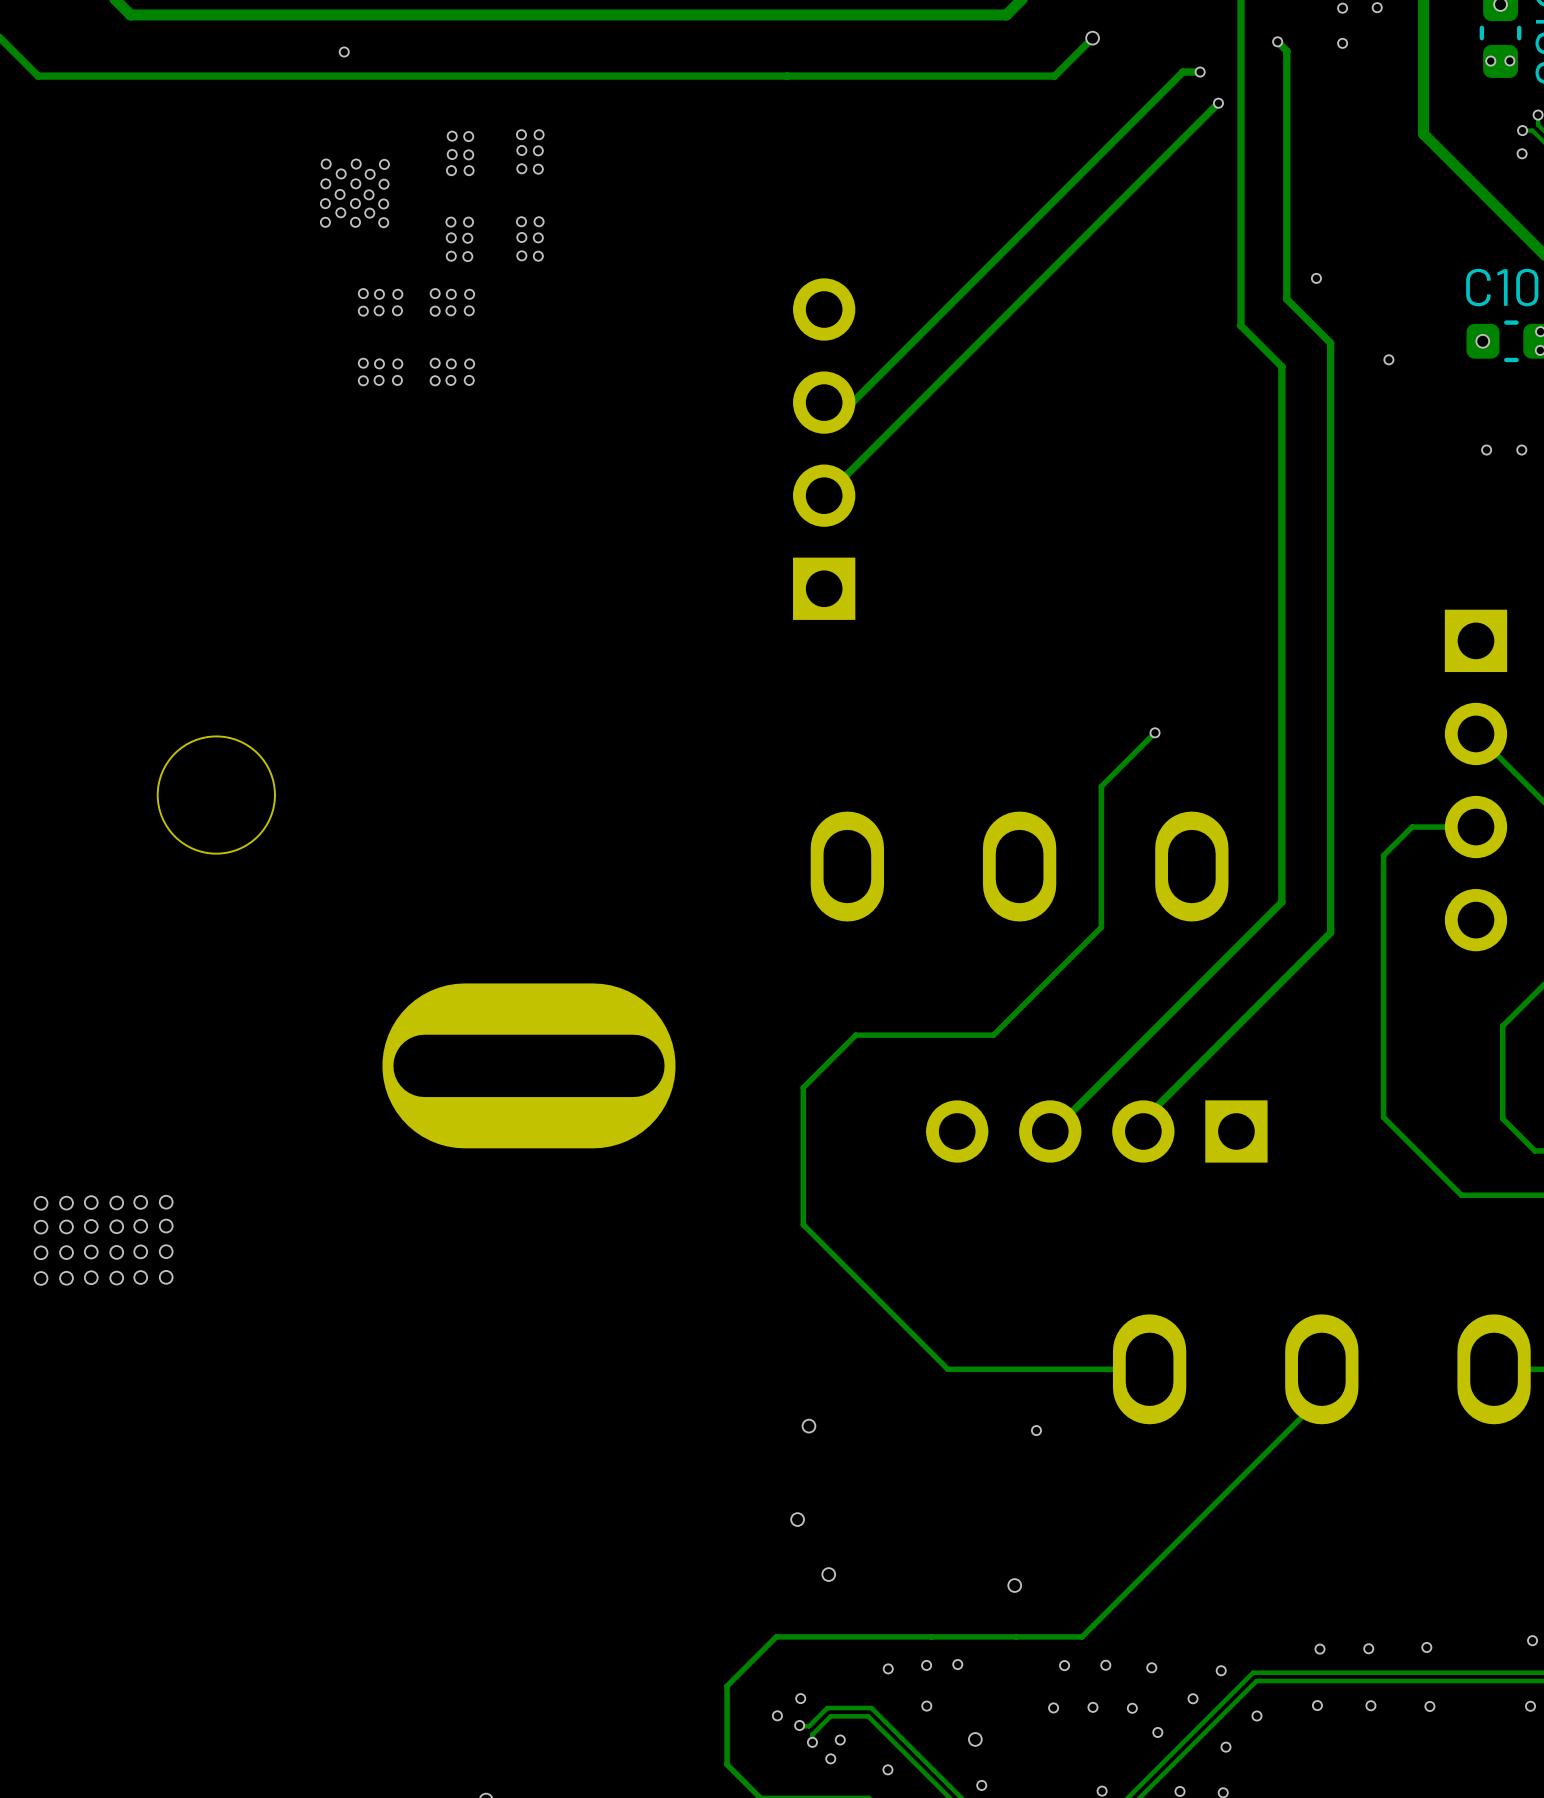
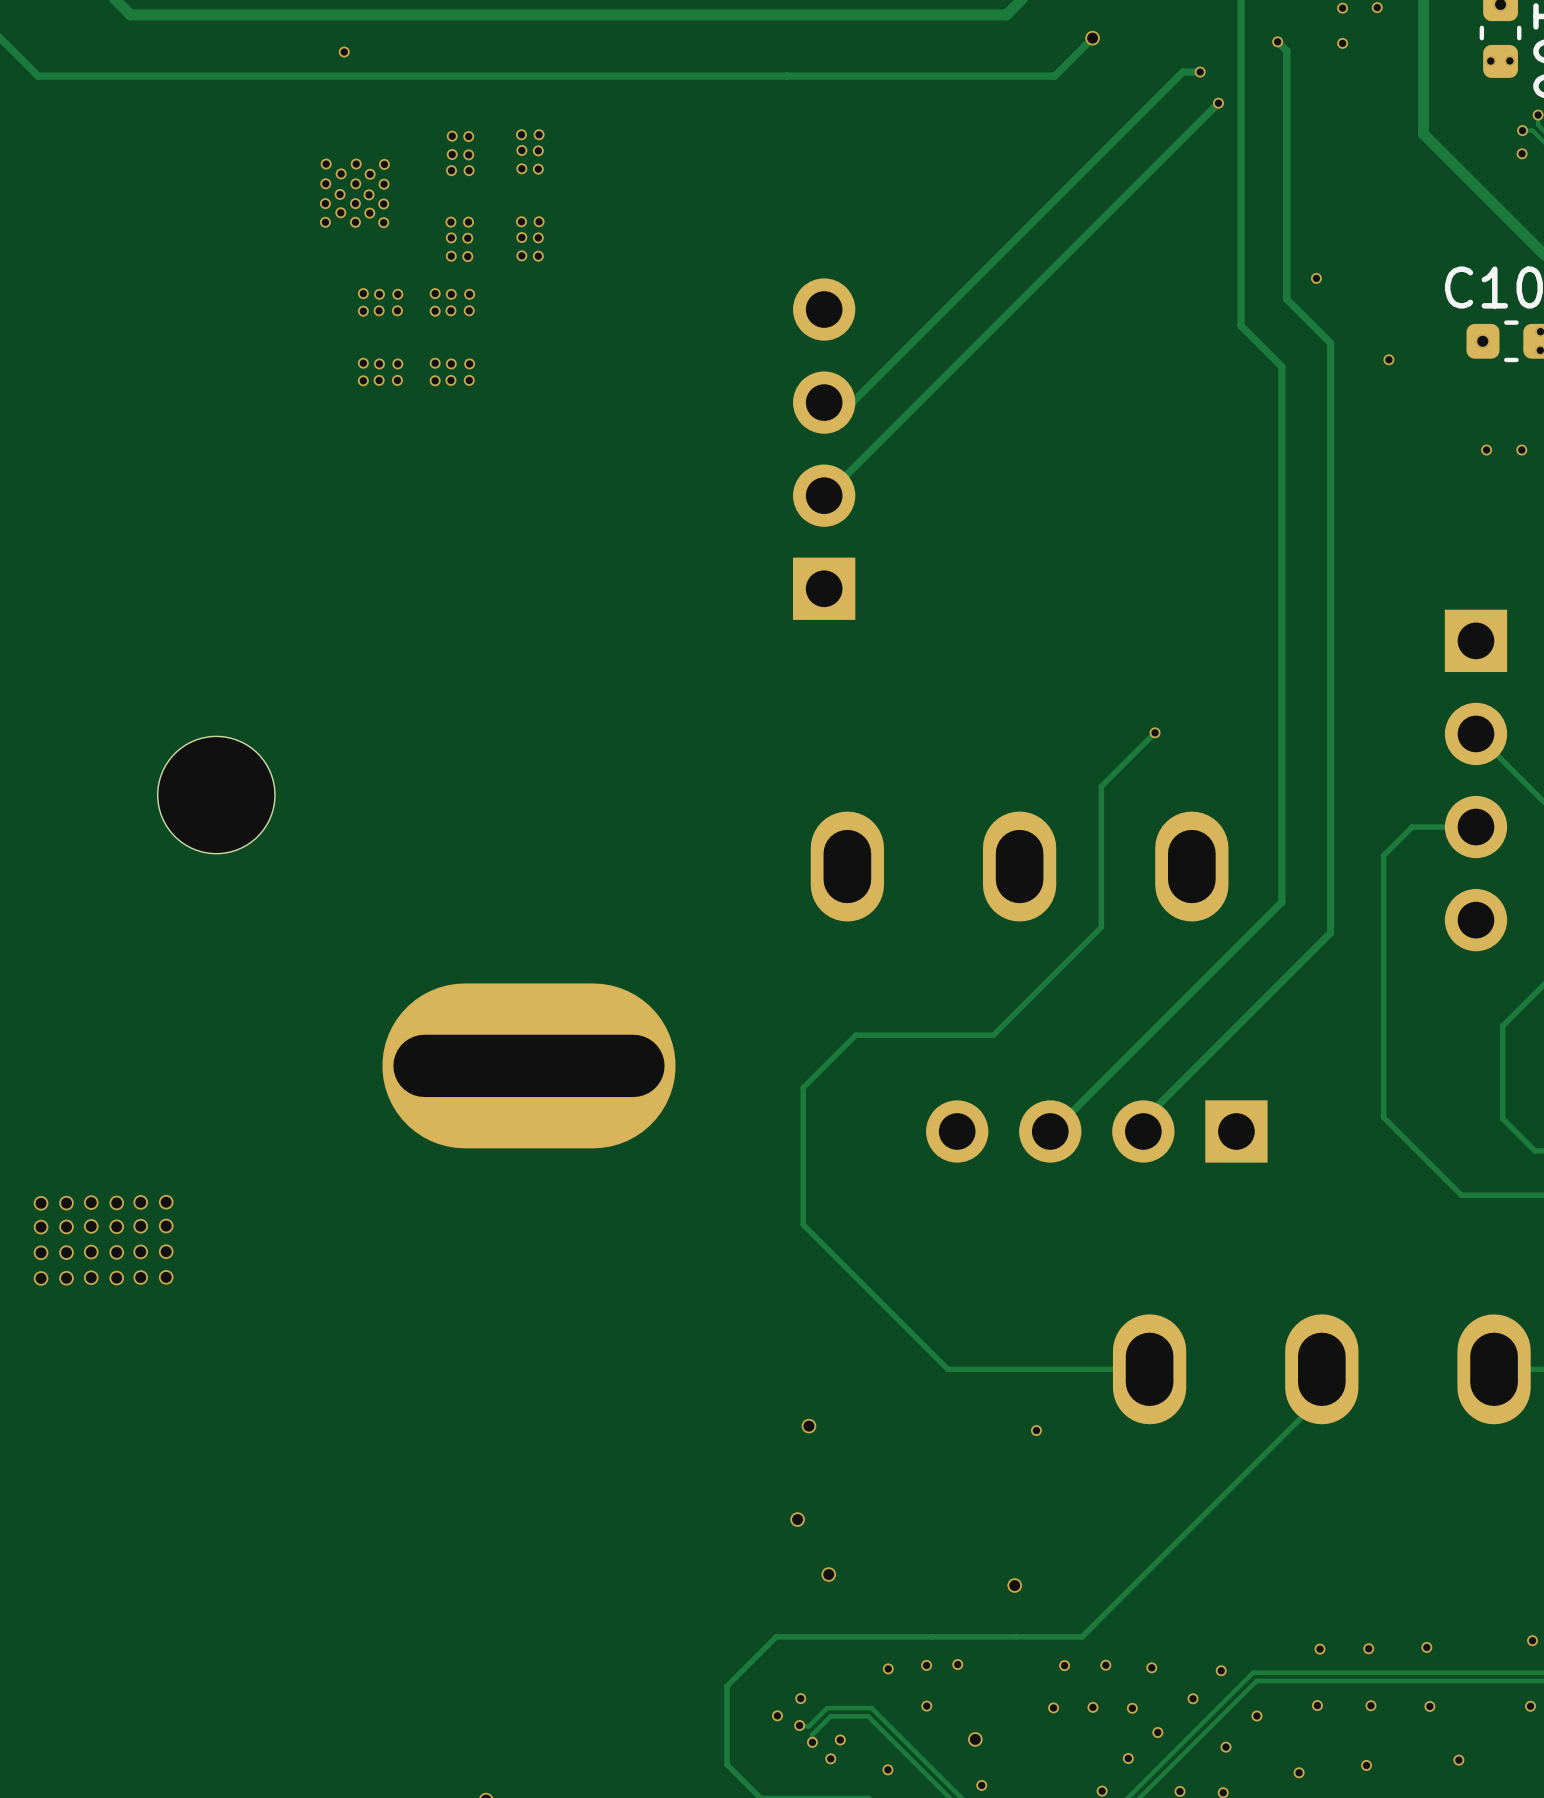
via: none -> (1128, 1758)
via: none -> (1458, 1760)
via: none -> (1366, 1765)
via: none -> (1299, 1772)

